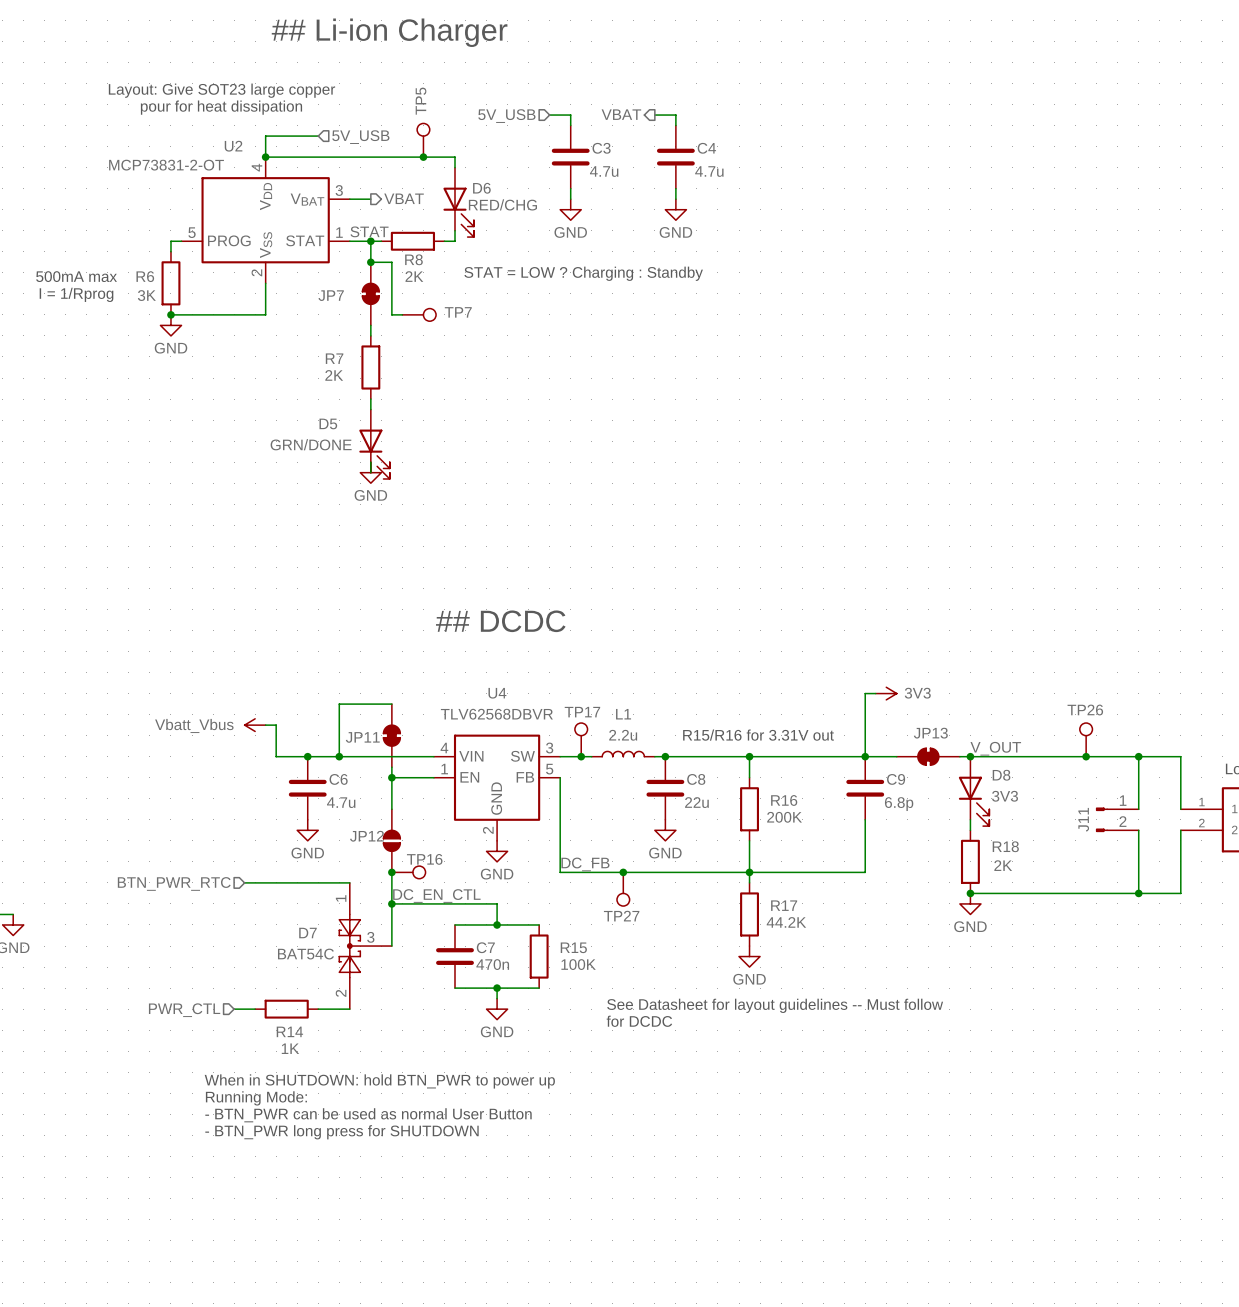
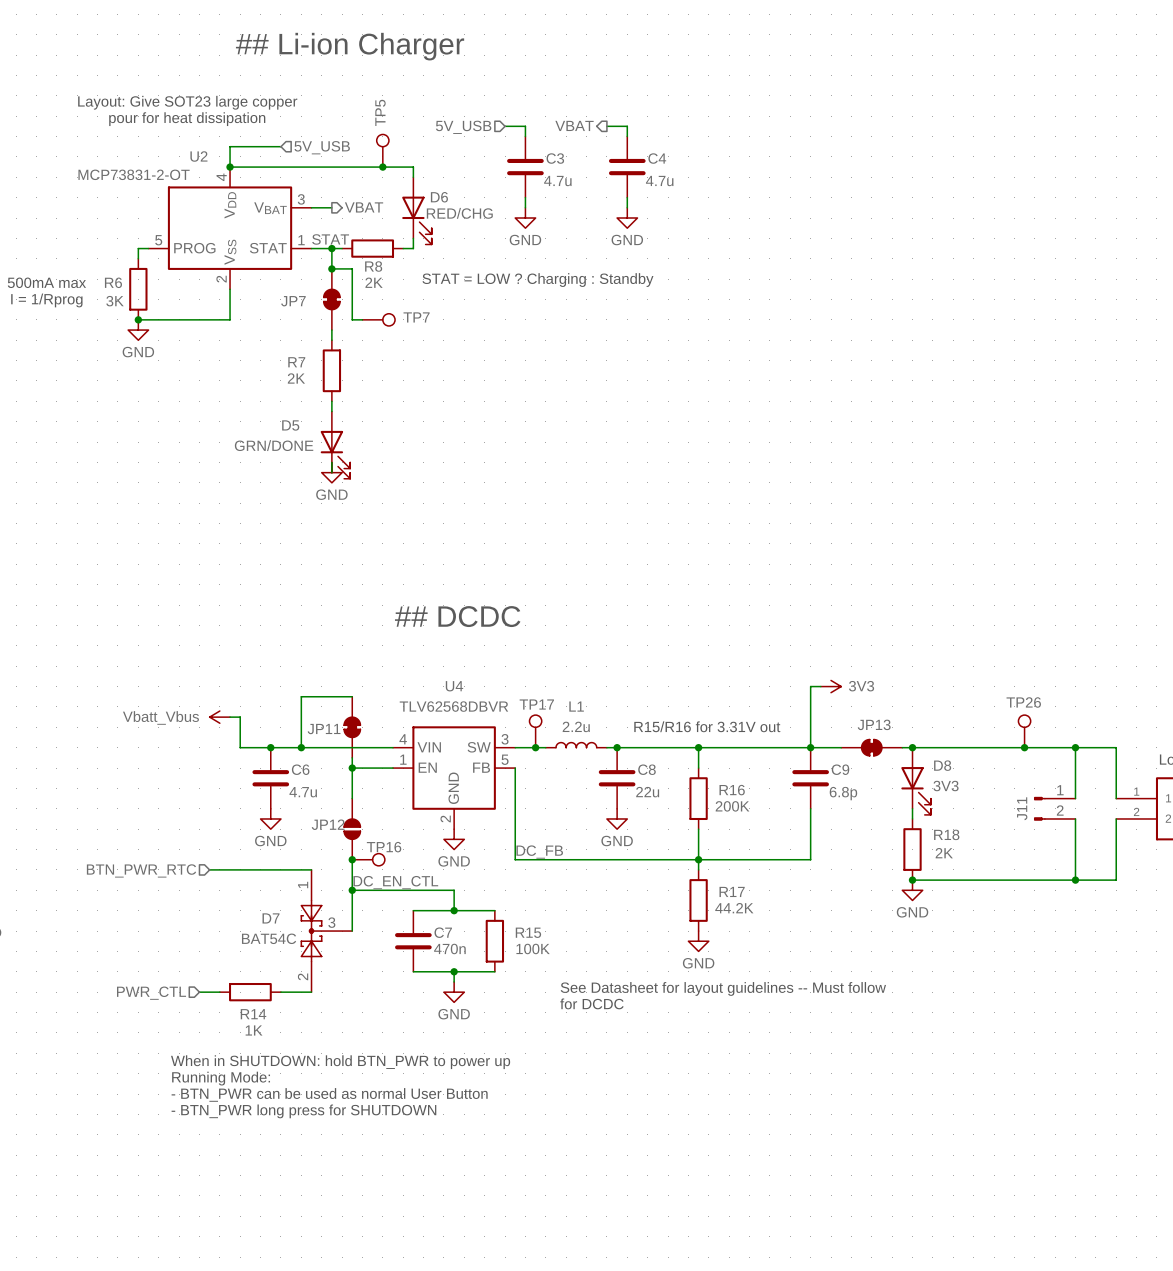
label: V_OUT (995, 748) -> none
junction: (623, 872) -> none
TP27: (623, 889) -> none

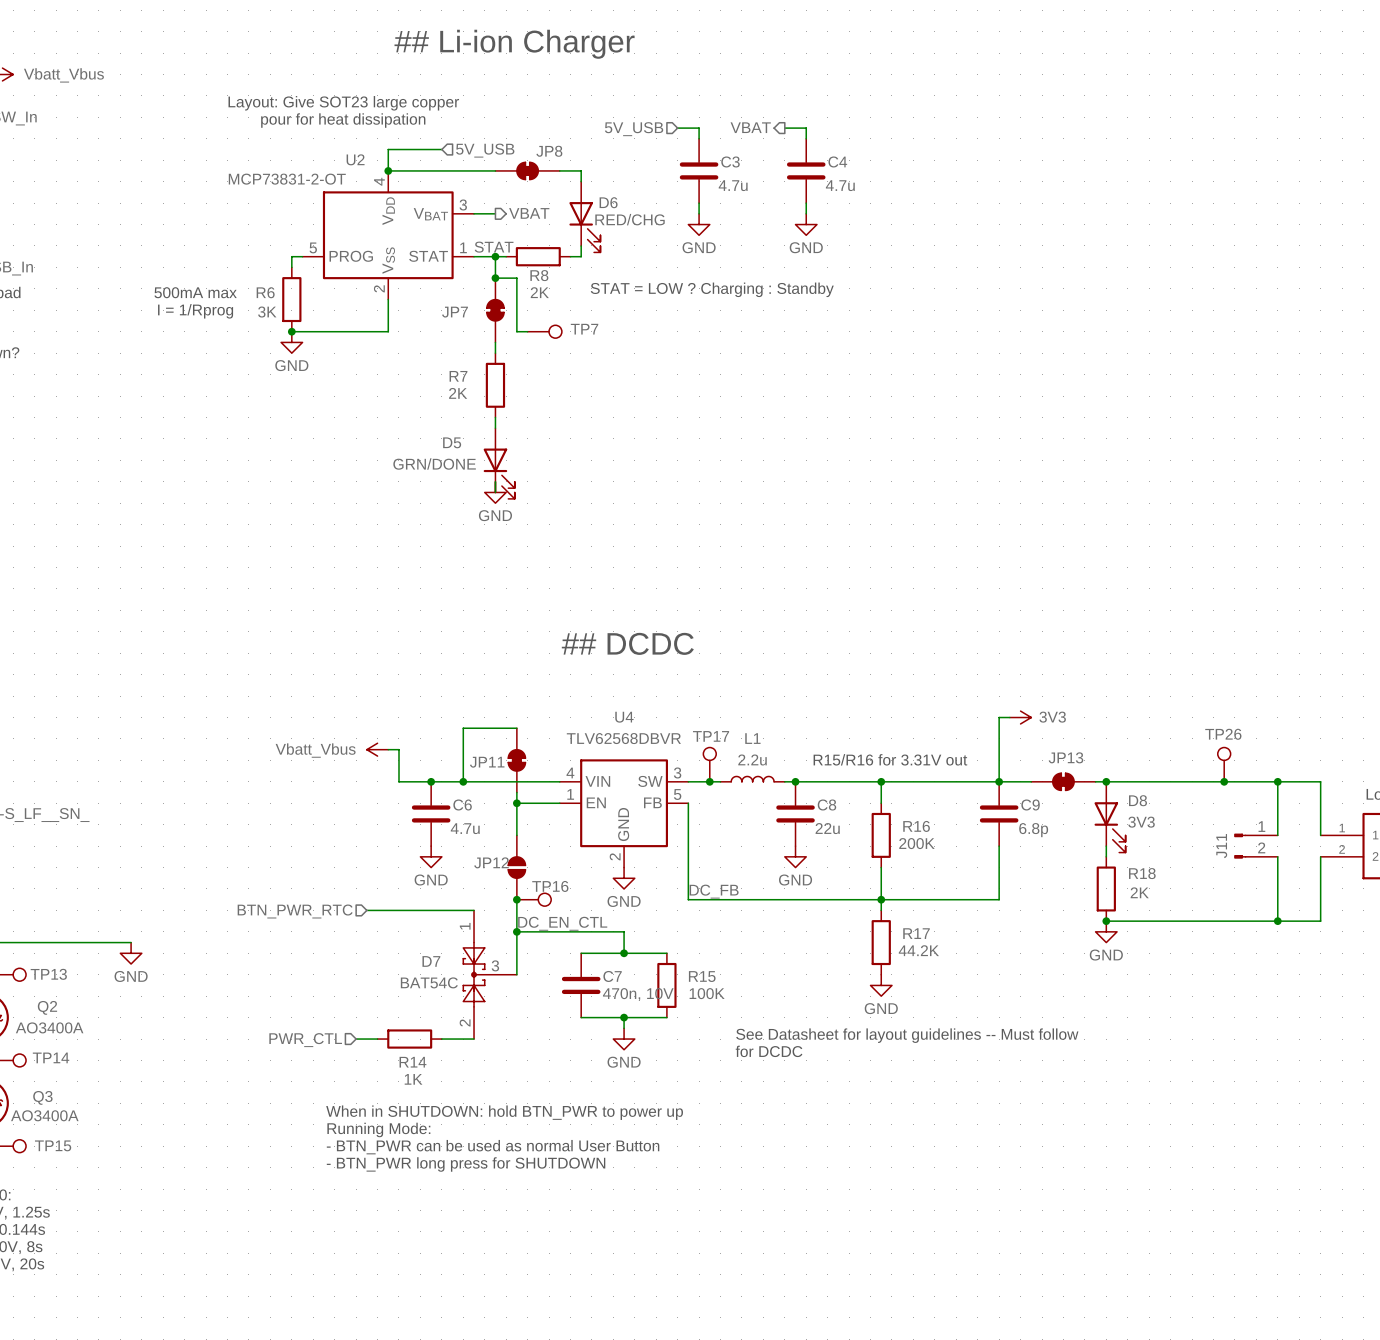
TP5: (382, 150) -> none
JP8: none -> (527, 170)
junction: (382, 167) -> none
C7 value: 470n (449, 948) -> 470n, 10V (638, 994)

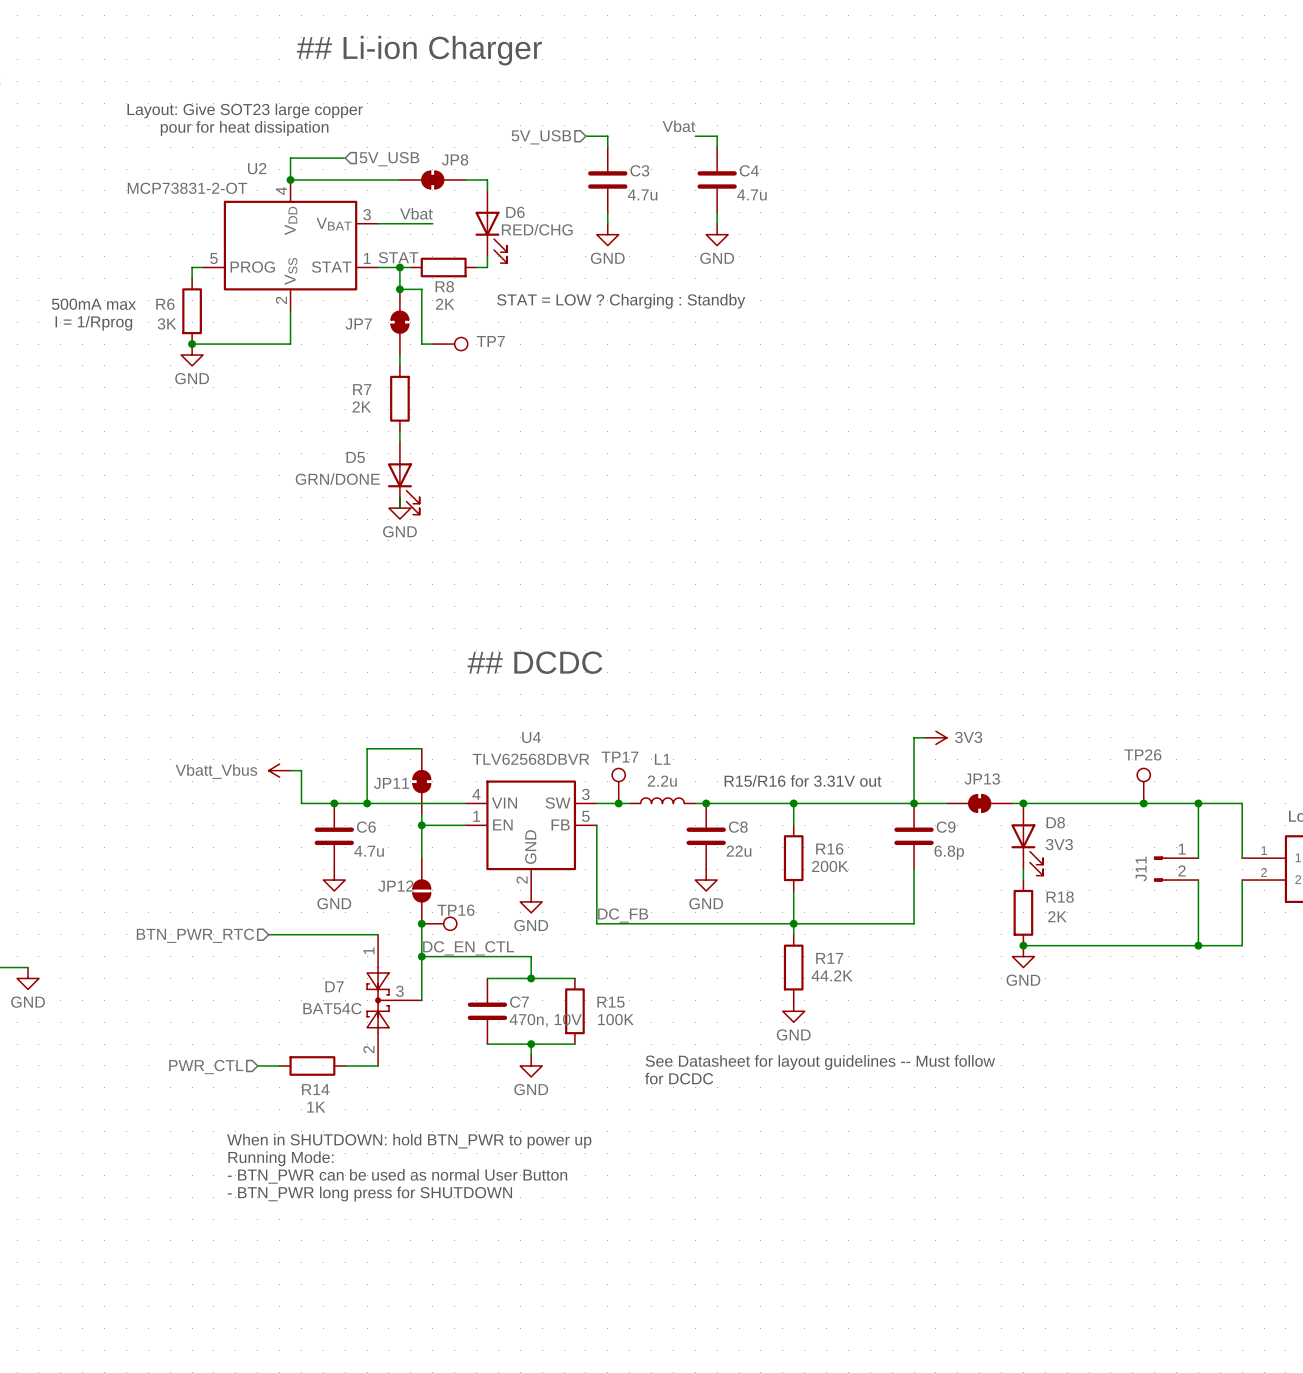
label: none -> Vbat (678, 126)
hierarchical label: VBAT (750, 127) -> none
label: none -> Vbat (416, 213)
wire: none -> (399, 223) (432, 223)
hierarchical label: VBAT (529, 213) -> none

